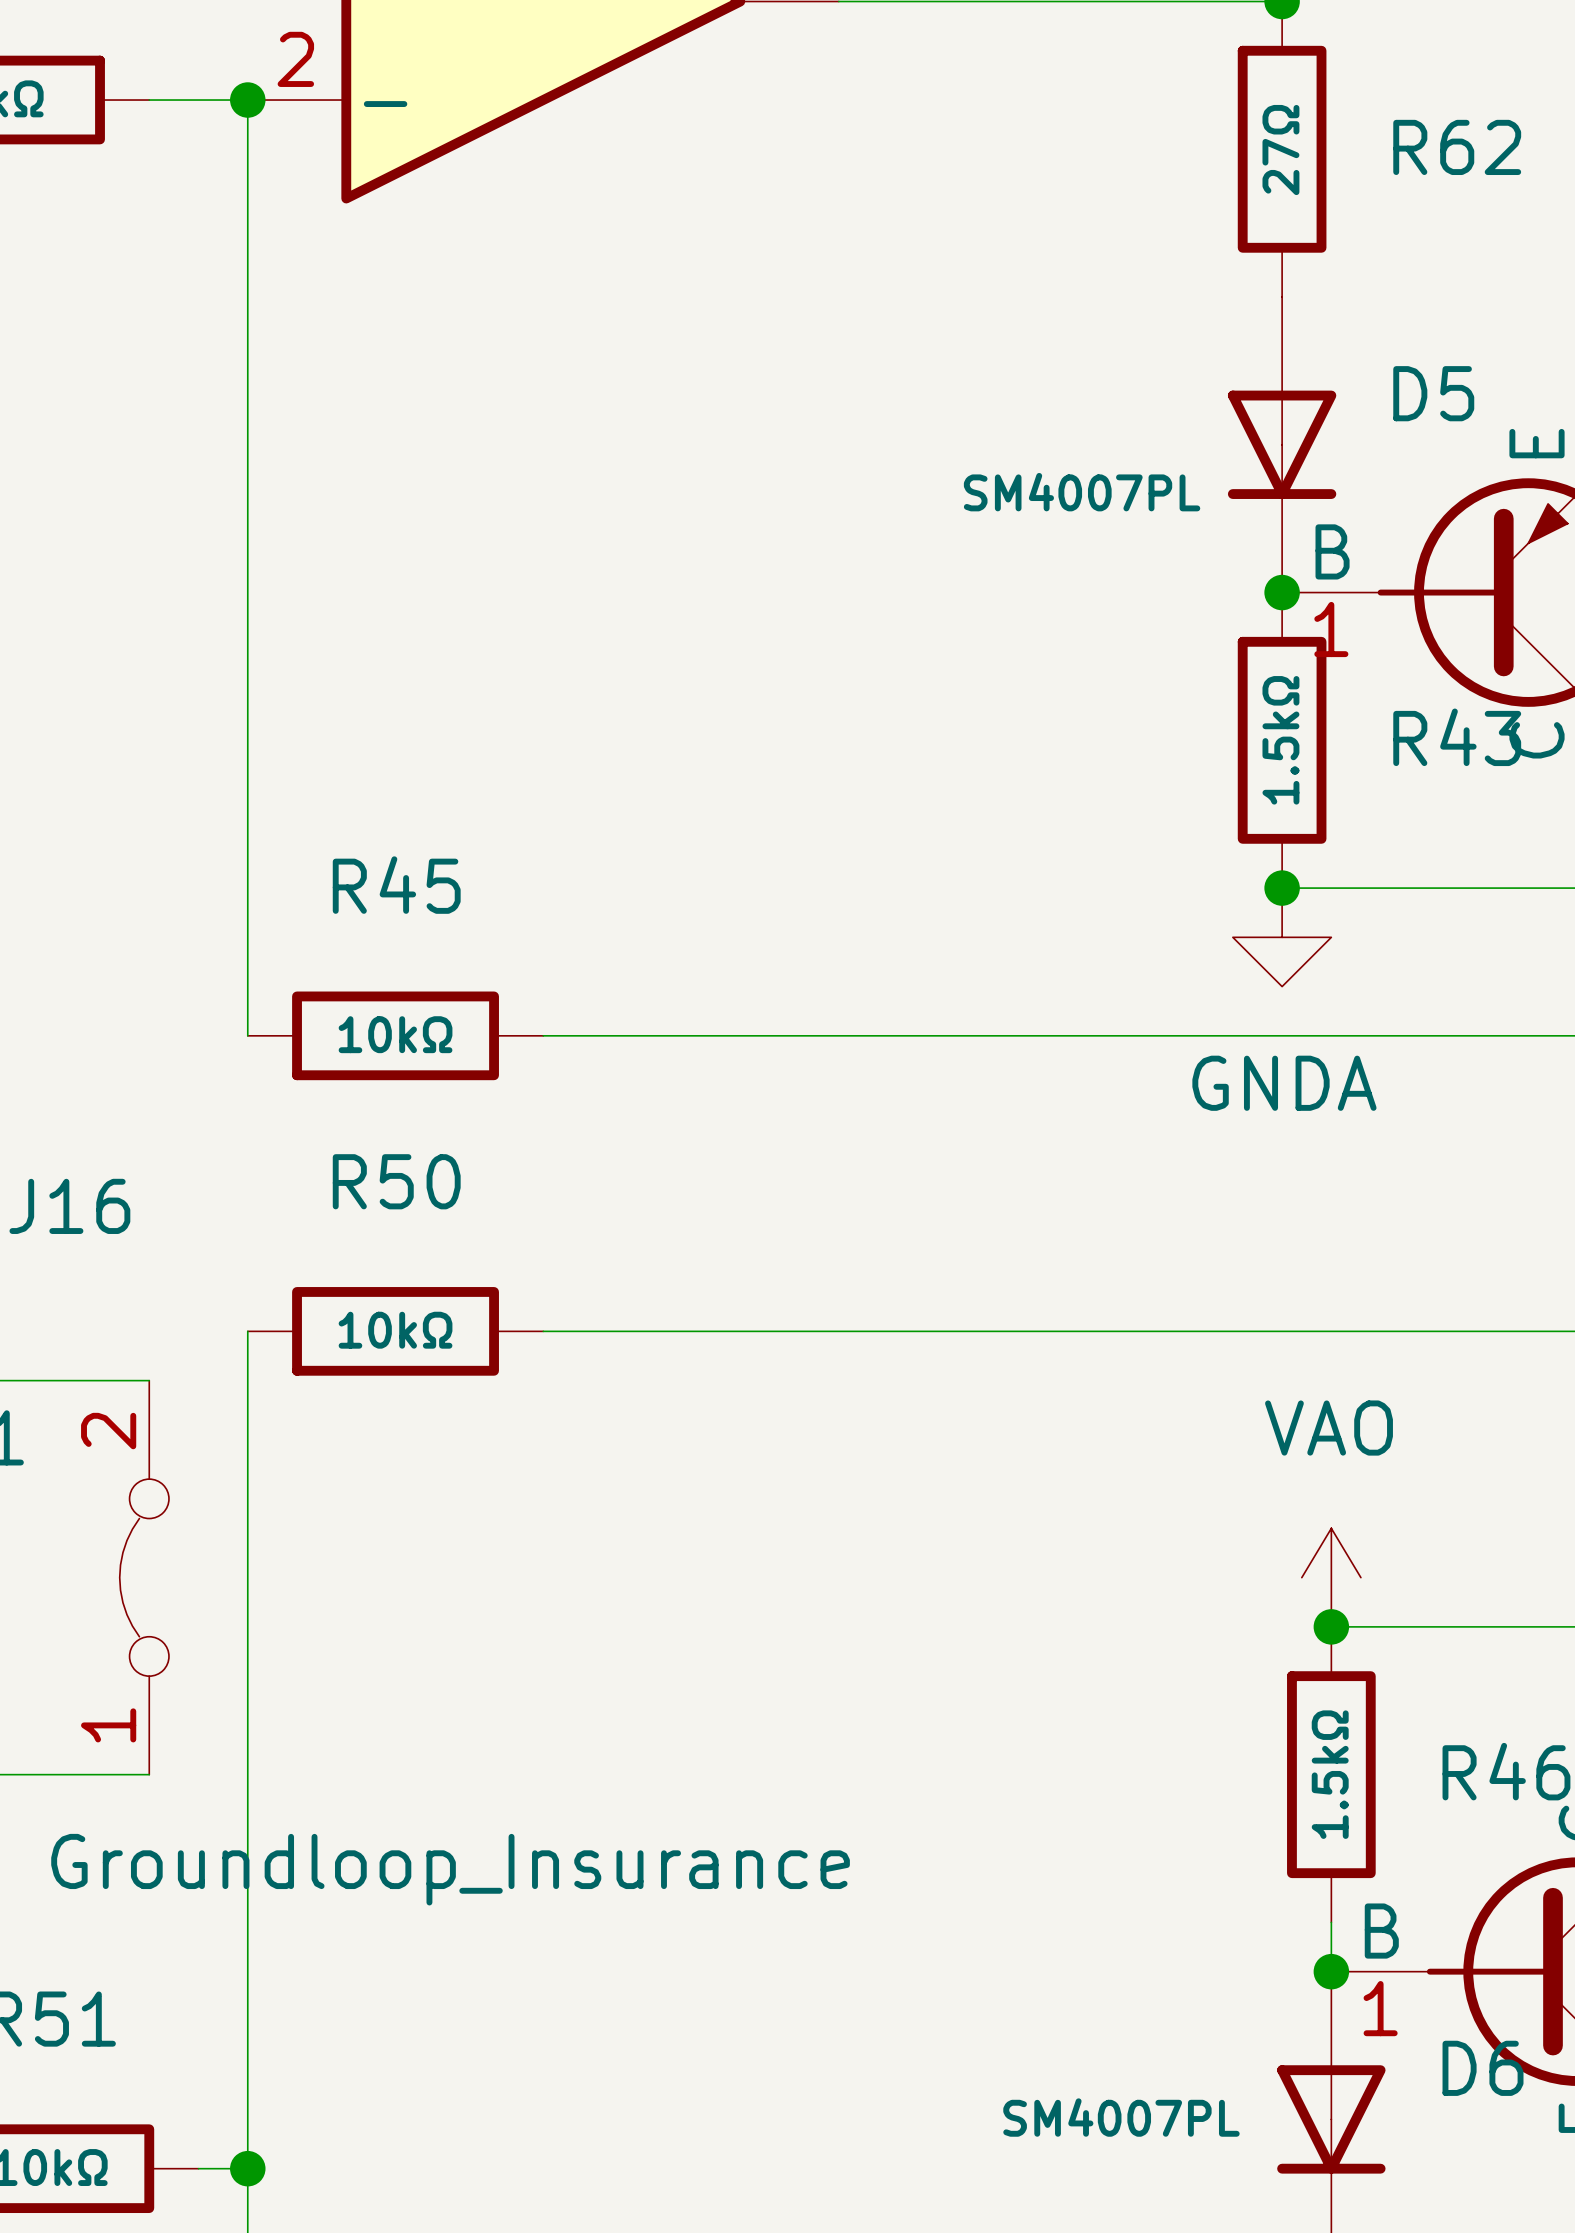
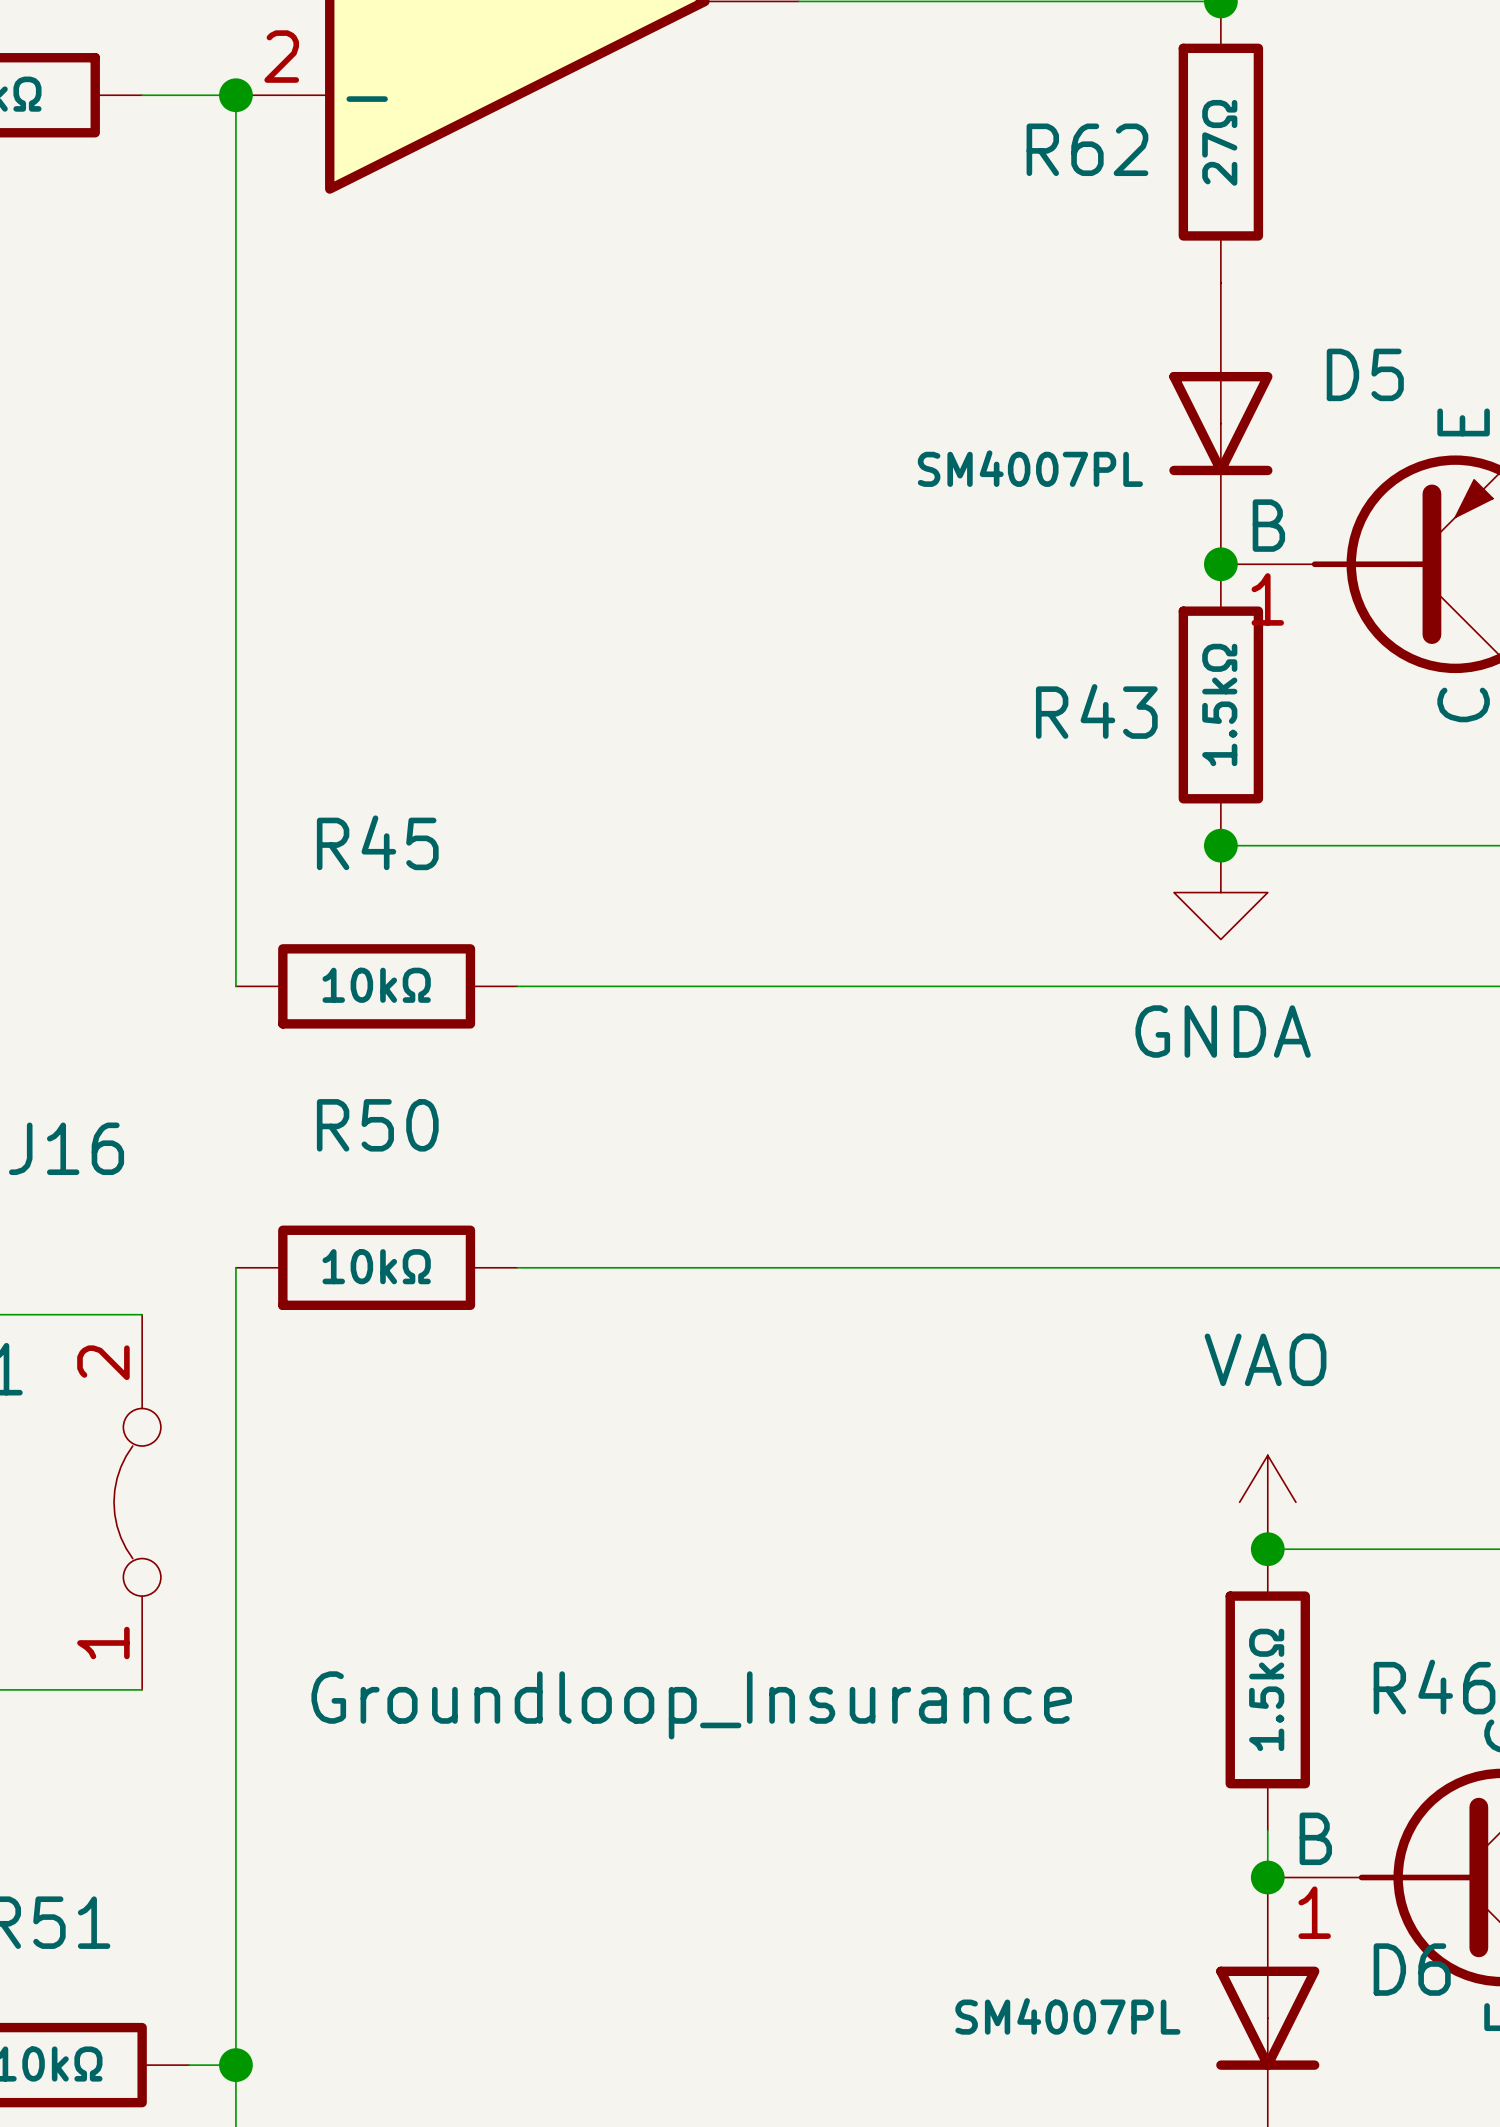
R62 name position: R62 (1457, 147) -> R62 (1087, 149)
R43 name position: R43 (1457, 737) -> R43 (1096, 711)
part value position: Groundloop_Insurance (450, 1869) -> Groundloop_Insurance (691, 1705)

